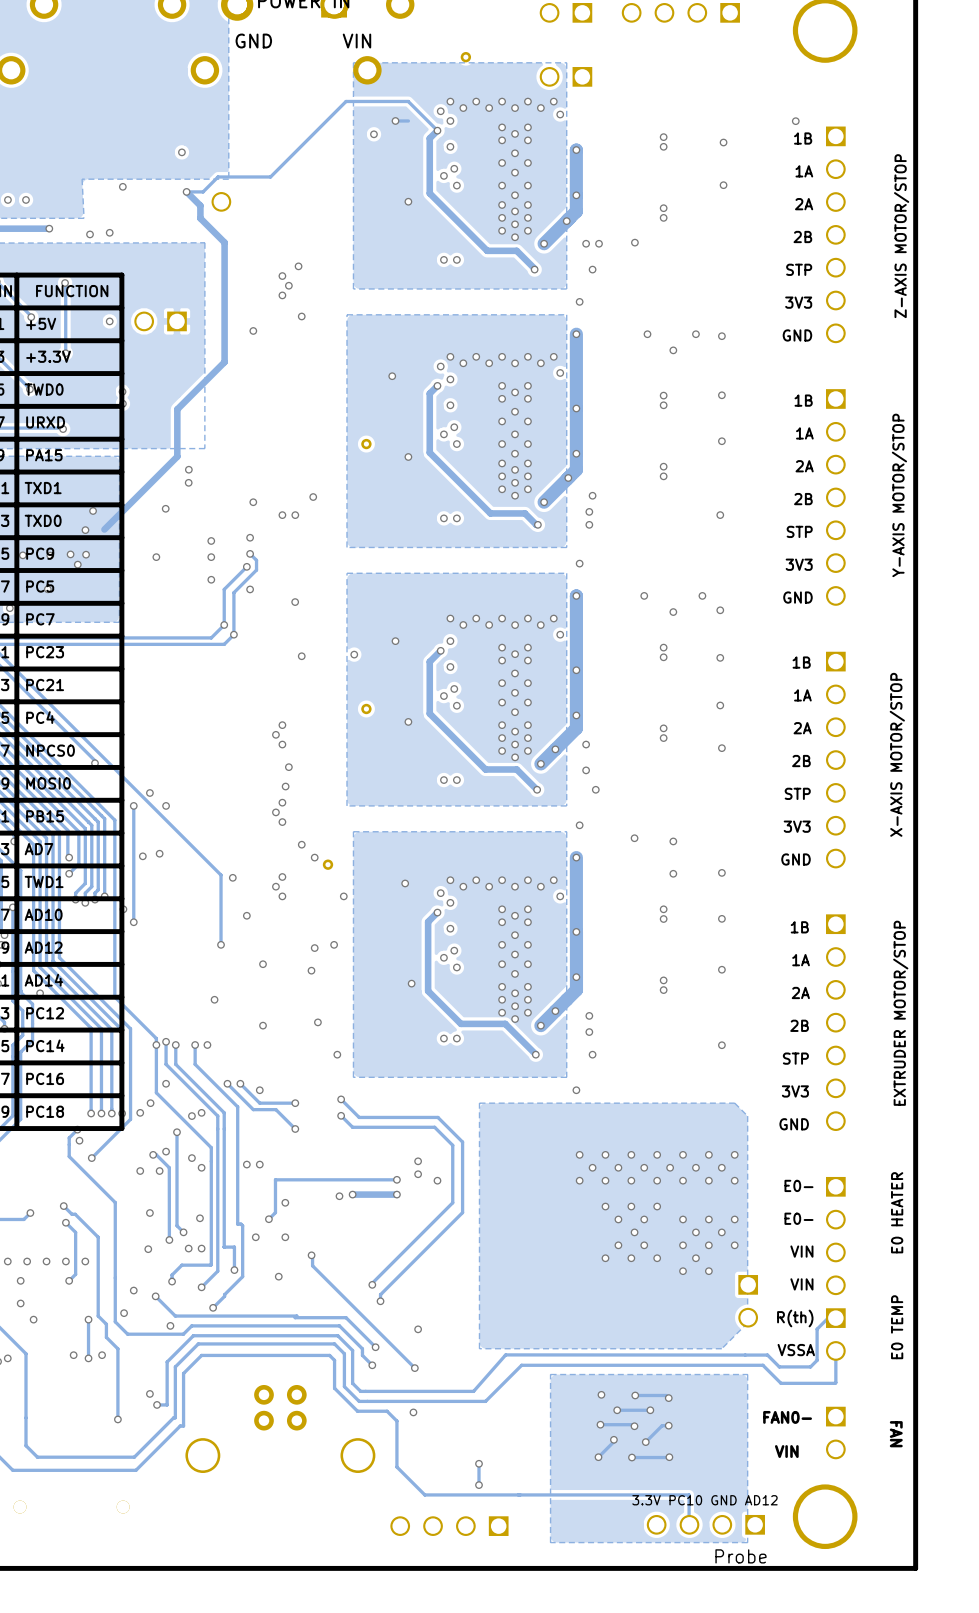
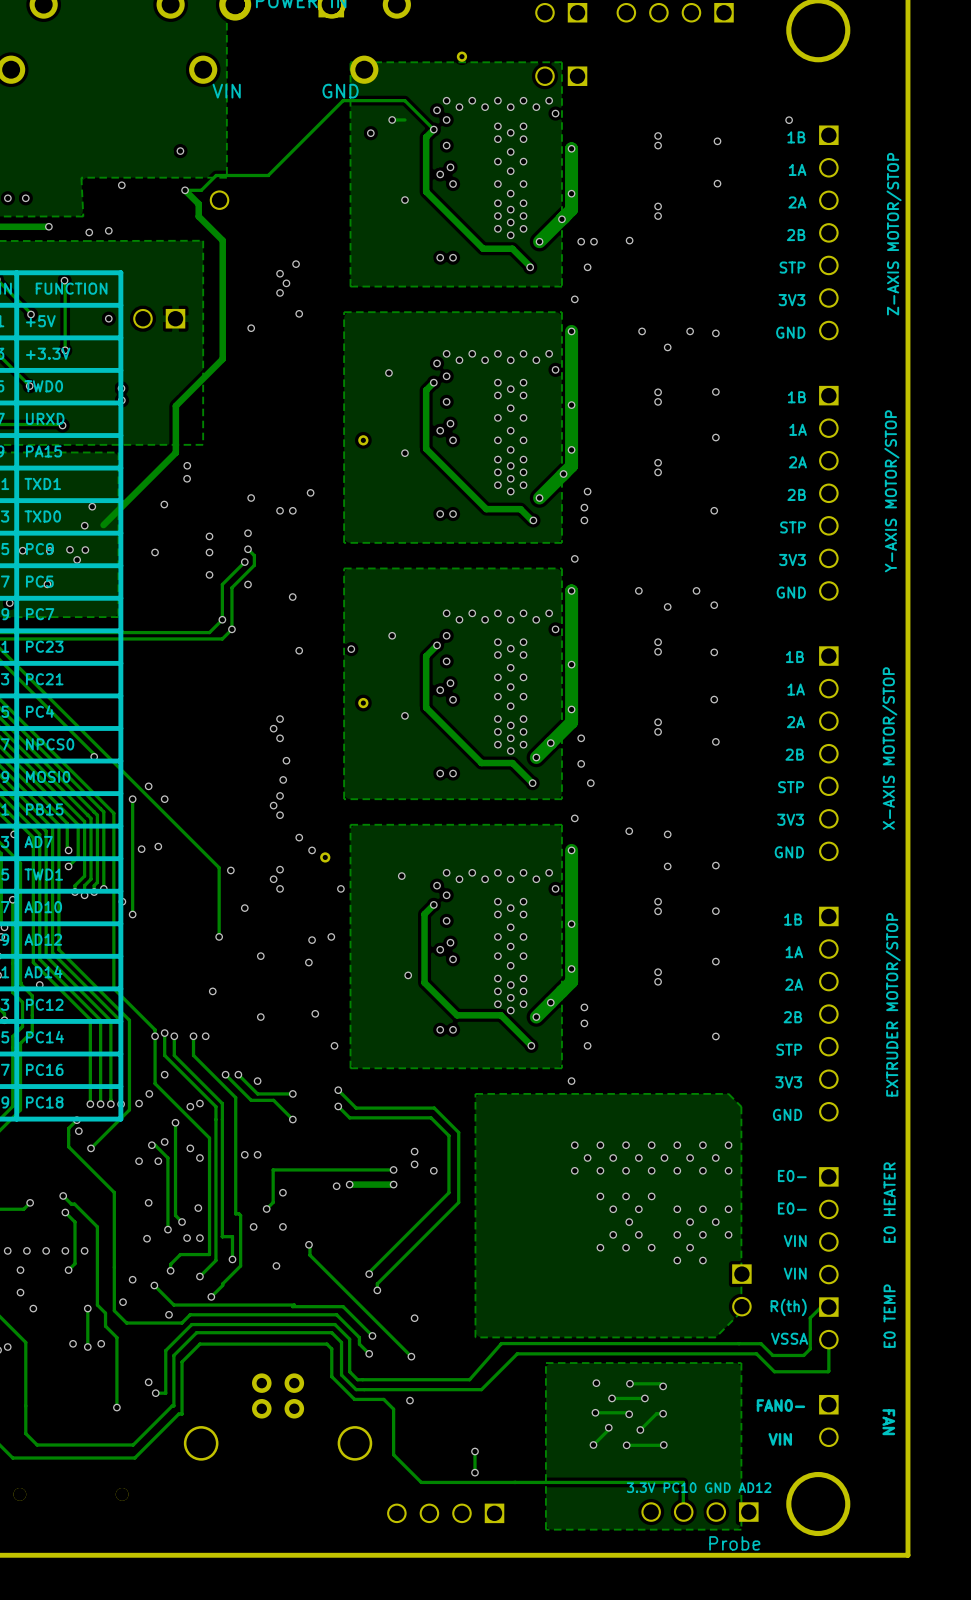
text: GND VIN (303, 41) -> none
text: none -> VIN GND (285, 91)

